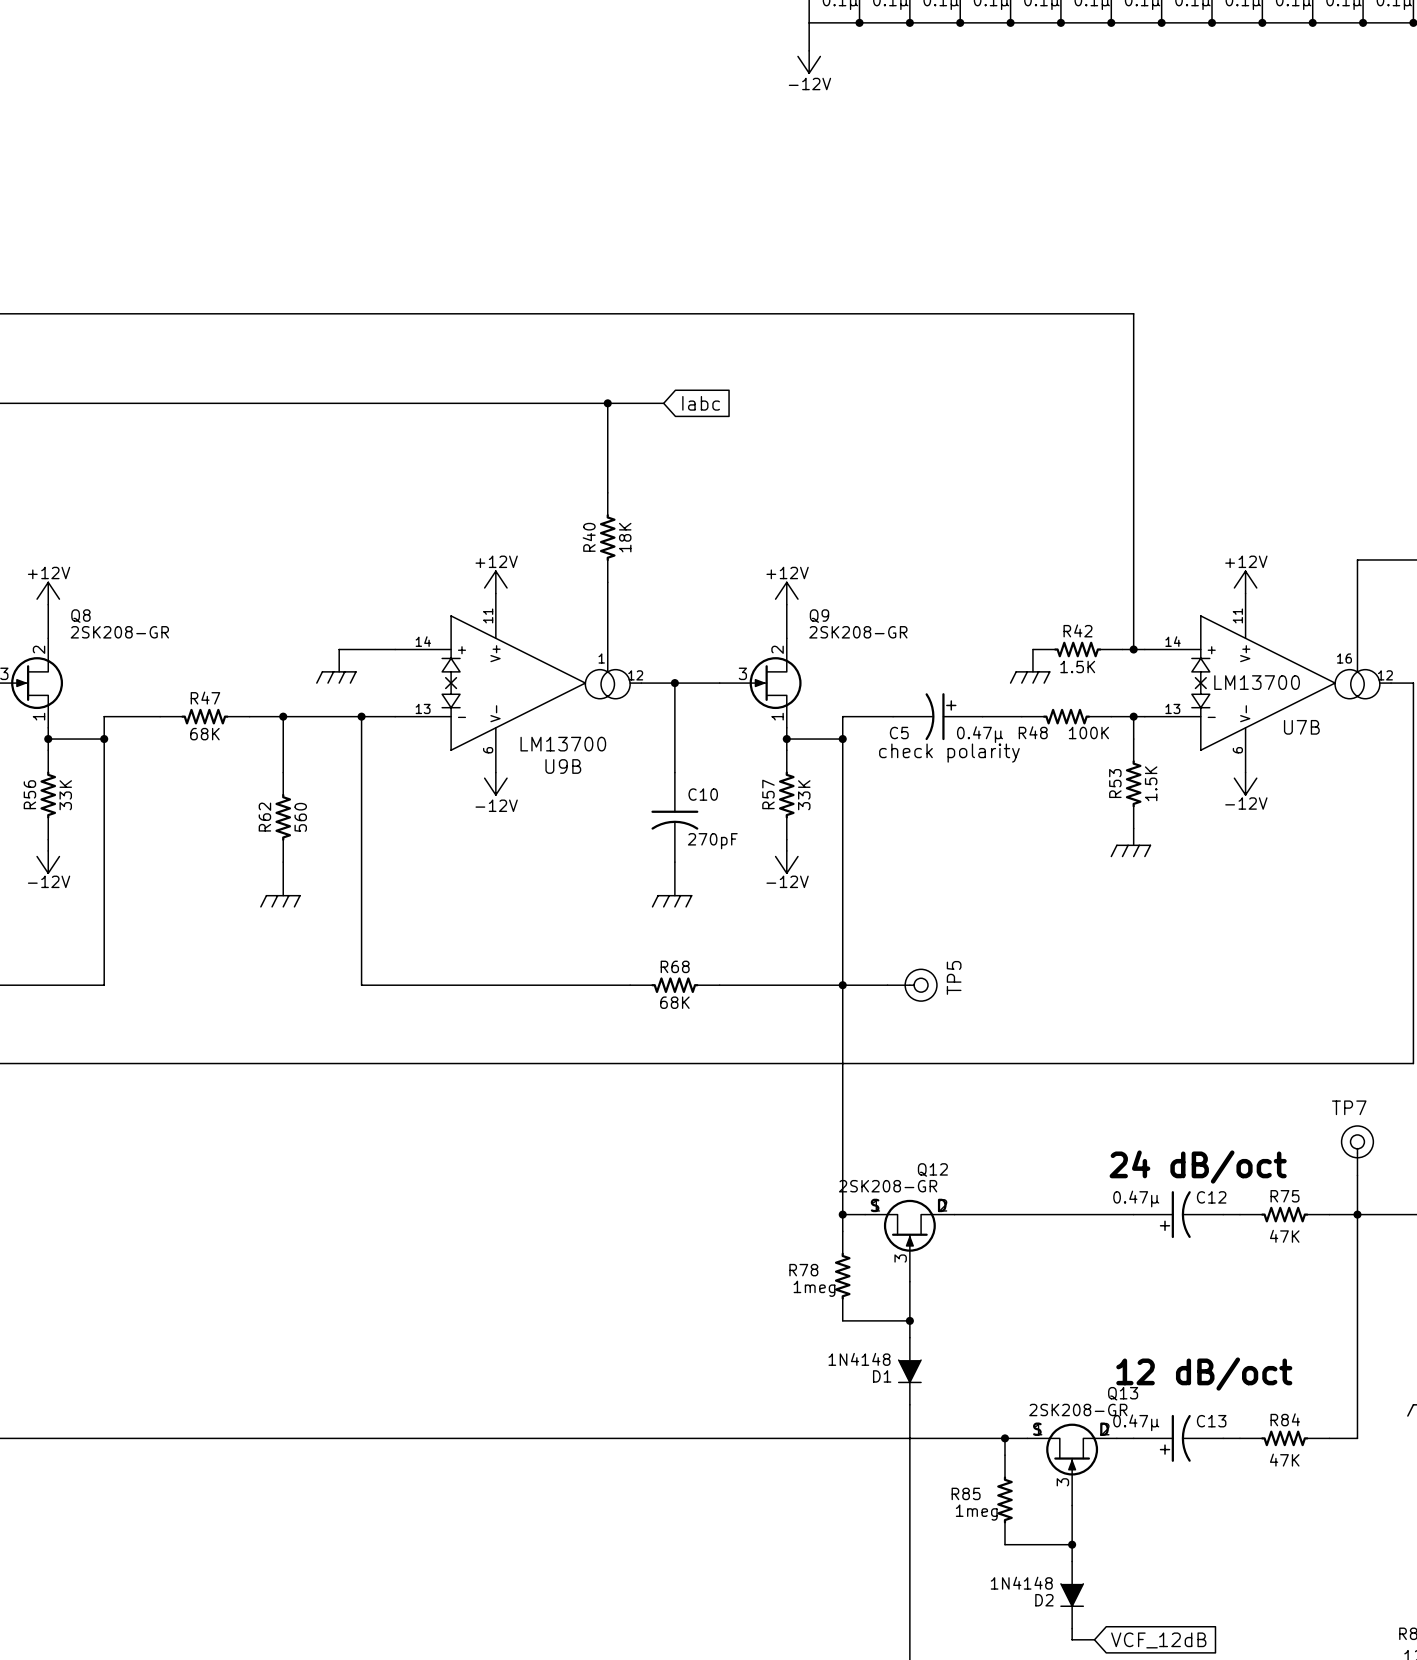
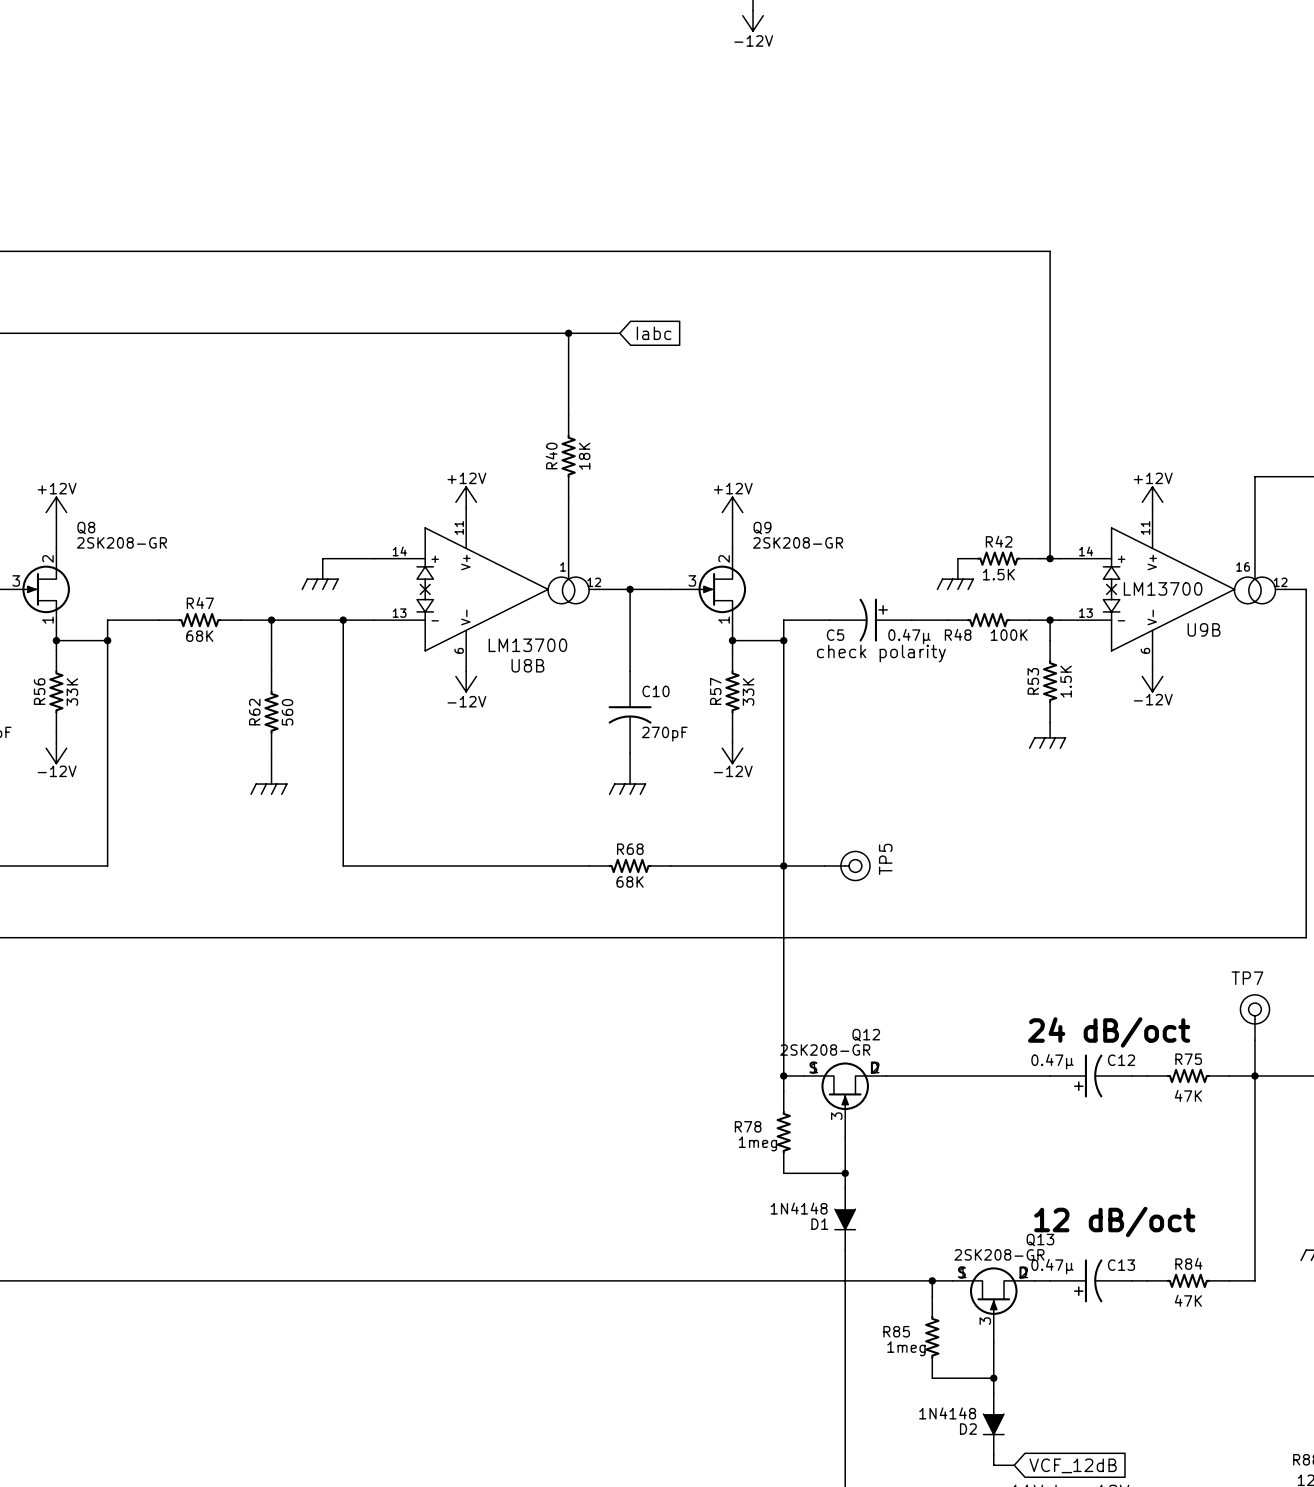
U7B name: U7B (1301, 727) -> U9B (1204, 629)
U9B name: U9B (563, 766) -> U8B (527, 665)

